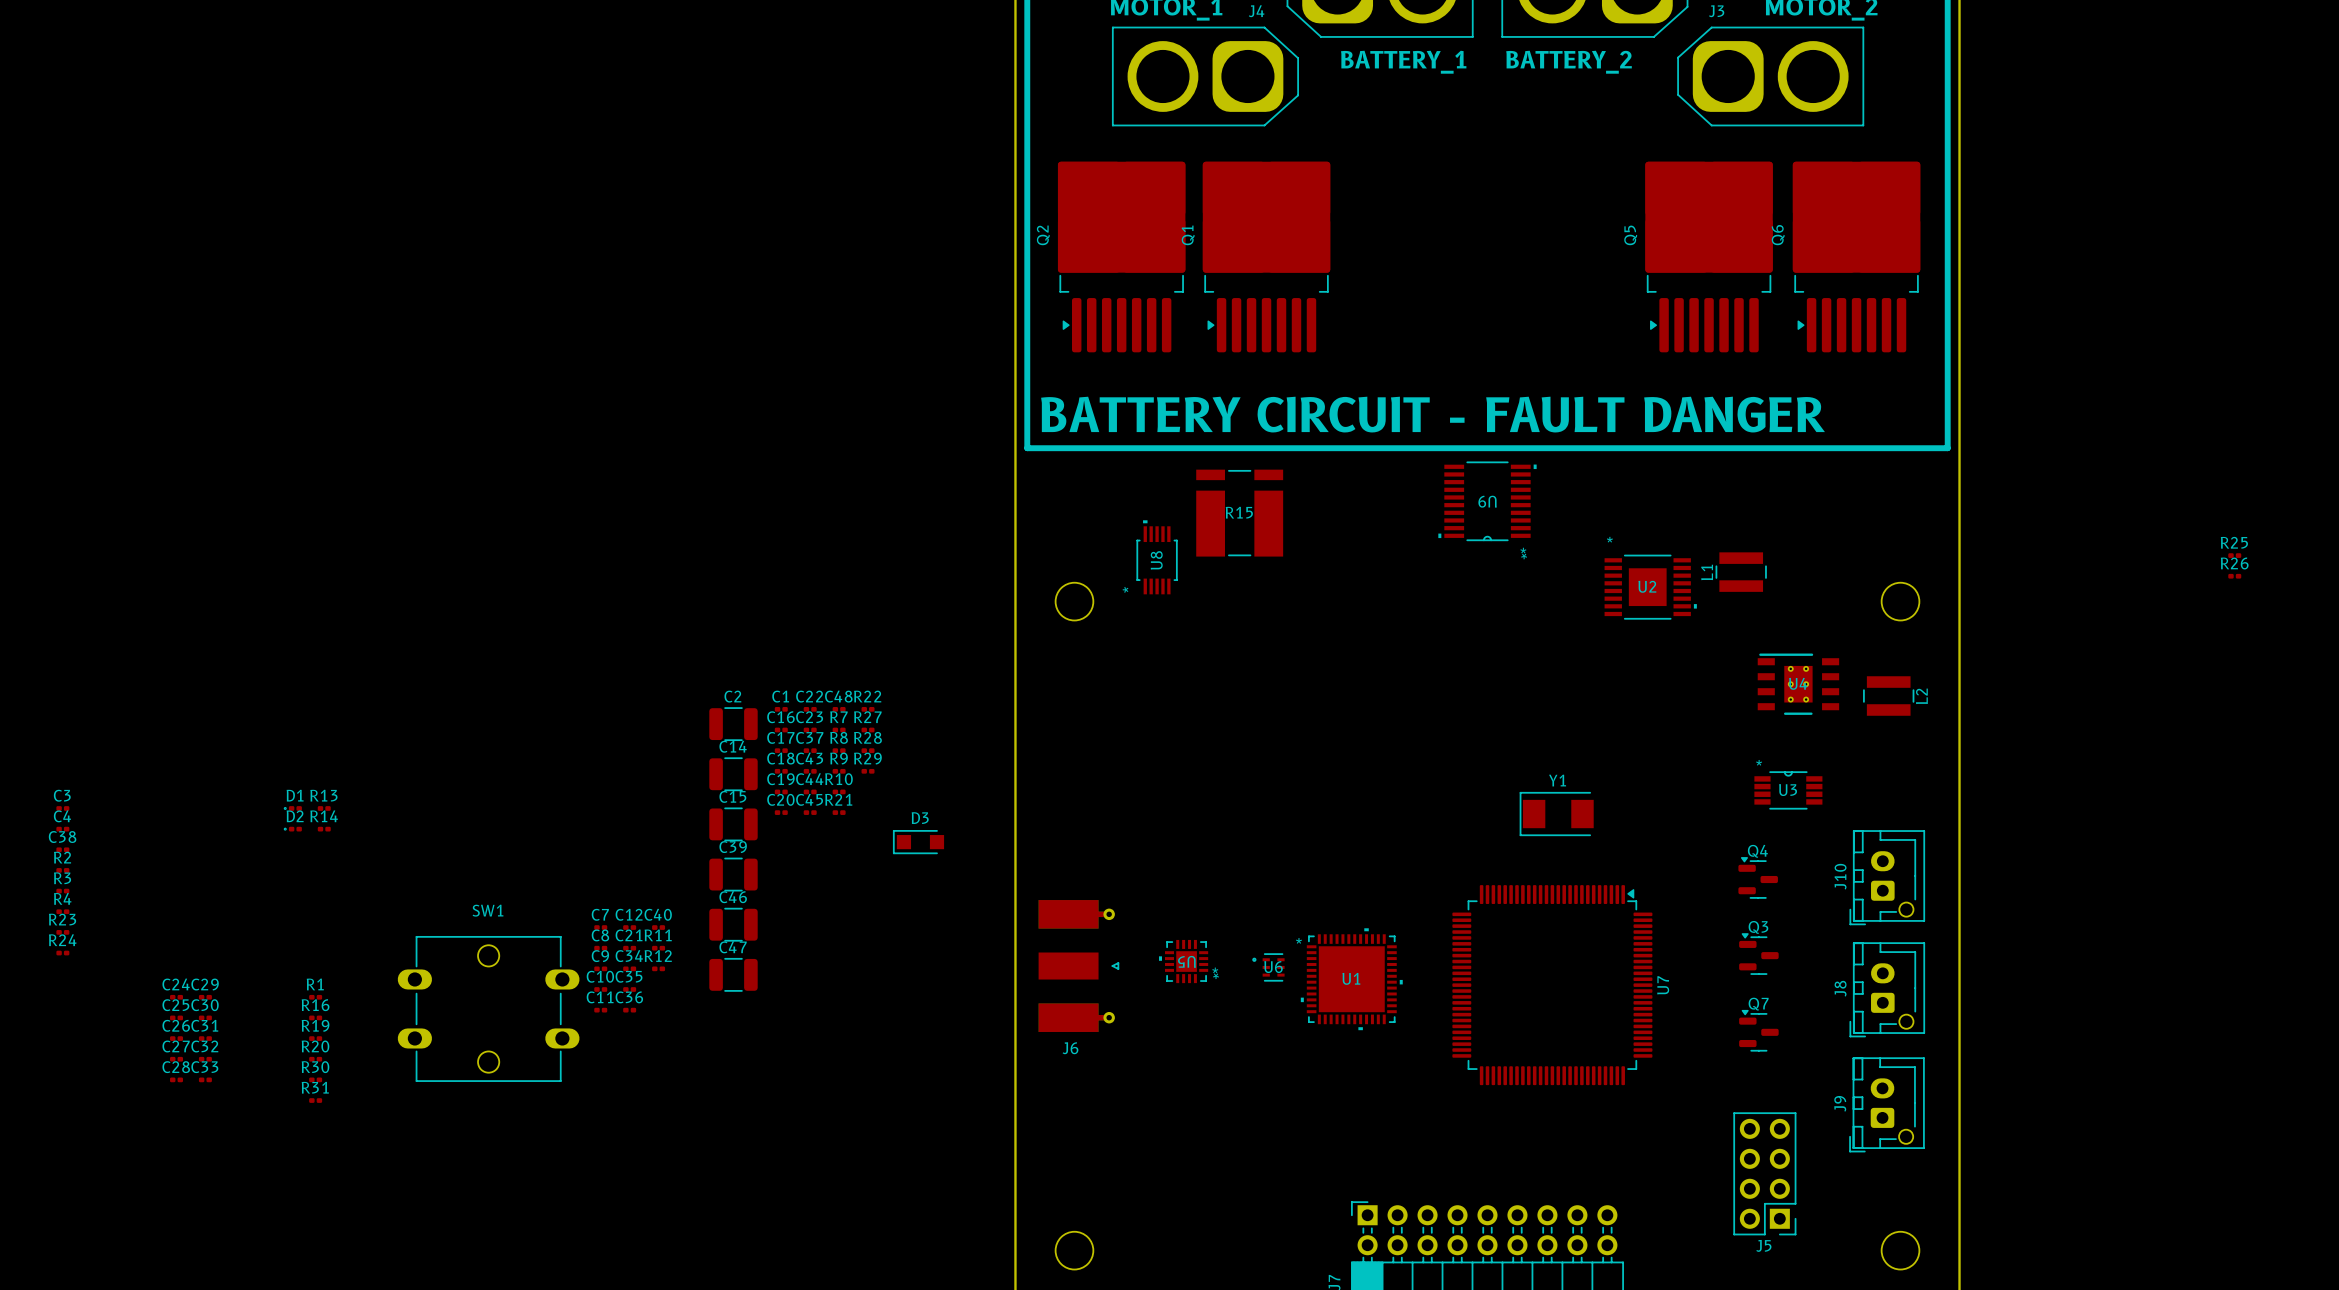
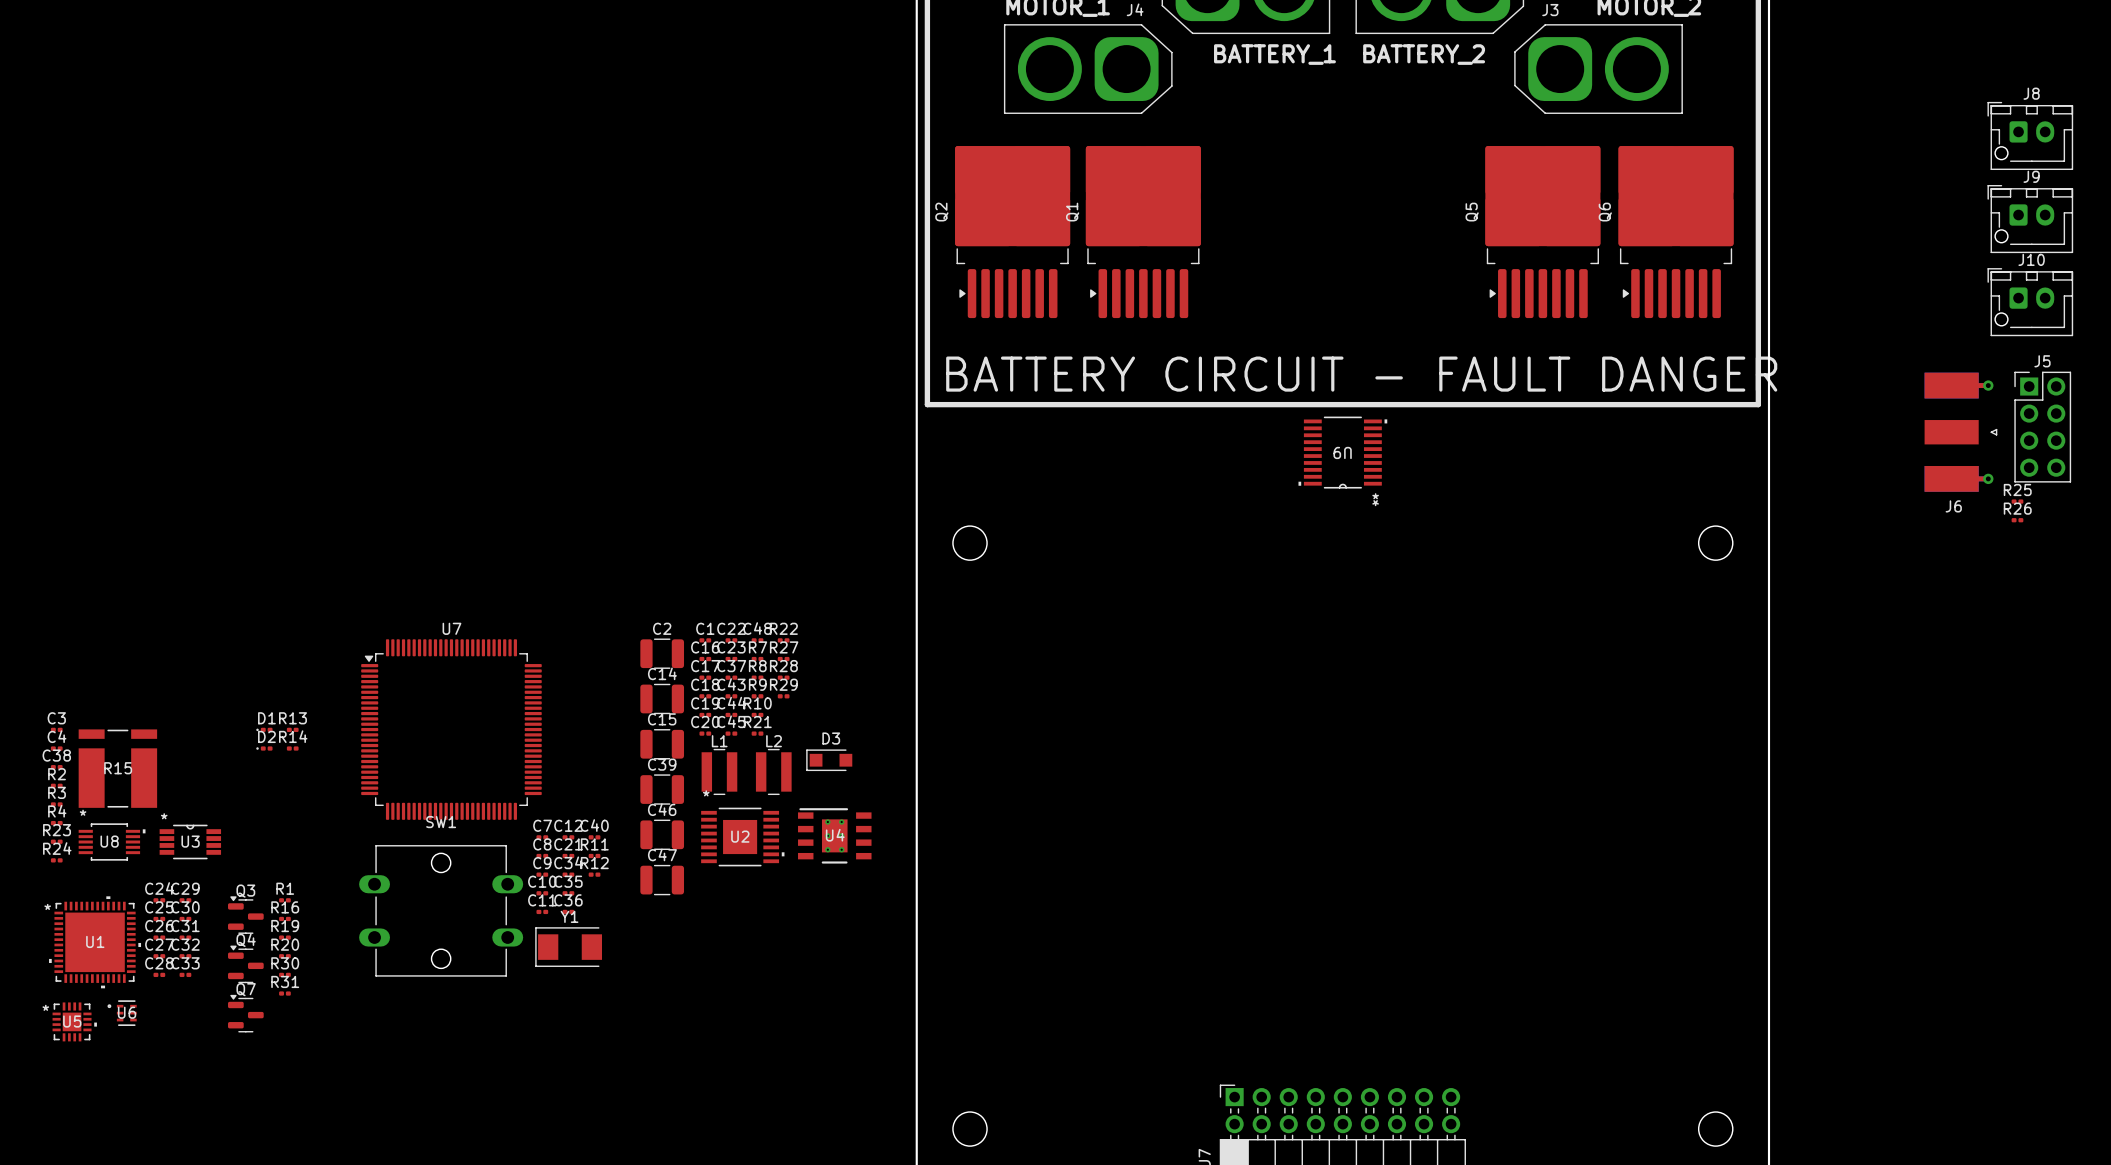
R15 position: (1239, 513) -> (117, 768)
U8 rotation: 0° (1157, 557) -> 90° clockwise (112, 841)
U8 position: (1157, 557) -> (112, 841)
L1 rotation: 0° (1741, 572) -> 90° clockwise (719, 771)
L1 position: (1741, 572) -> (719, 771)
U2 position: (1650, 587) -> (742, 837)
U4 position: (1798, 684) -> (834, 835)
L2 rotation: 0° (1888, 696) -> 90° clockwise (773, 771)
L2 position: (1888, 696) -> (773, 771)
L2 name position: L2 (1921, 696) -> L2 (774, 741)
U3 position: (1788, 790) -> (190, 841)
Y1 position: (1556, 814) -> (568, 947)
Q4 position: (1758, 877) -> (245, 964)
J10 rotation: 0° (1887, 877) -> 90° clockwise (2030, 302)
J10 position: (1887, 877) -> (2030, 302)
Q3 position: (1758, 953) -> (245, 915)
U5 rotation: 0° (1183, 961) -> 180° (74, 1021)
U5 position: (1183, 961) -> (74, 1021)
J6 position: (1078, 966) -> (1960, 432)
U6 position: (1268, 967) -> (122, 1013)
U1 position: (1351, 979) -> (95, 942)
U7 rotation: 0° (1552, 985) -> 90° counterclockwise (451, 729)
U7 position: (1552, 985) -> (451, 729)
J8 rotation: 0° (1887, 989) -> 90° clockwise (2030, 135)
J8 position: (1887, 989) -> (2030, 135)
Q7 position: (1758, 1030) -> (245, 1013)
J9 rotation: 0° (1887, 1104) -> 90° clockwise (2030, 219)
J9 position: (1887, 1104) -> (2030, 219)
J5 rotation: 0° (1764, 1173) -> 180° (2042, 427)
J5 position: (1764, 1173) -> (2042, 427)

